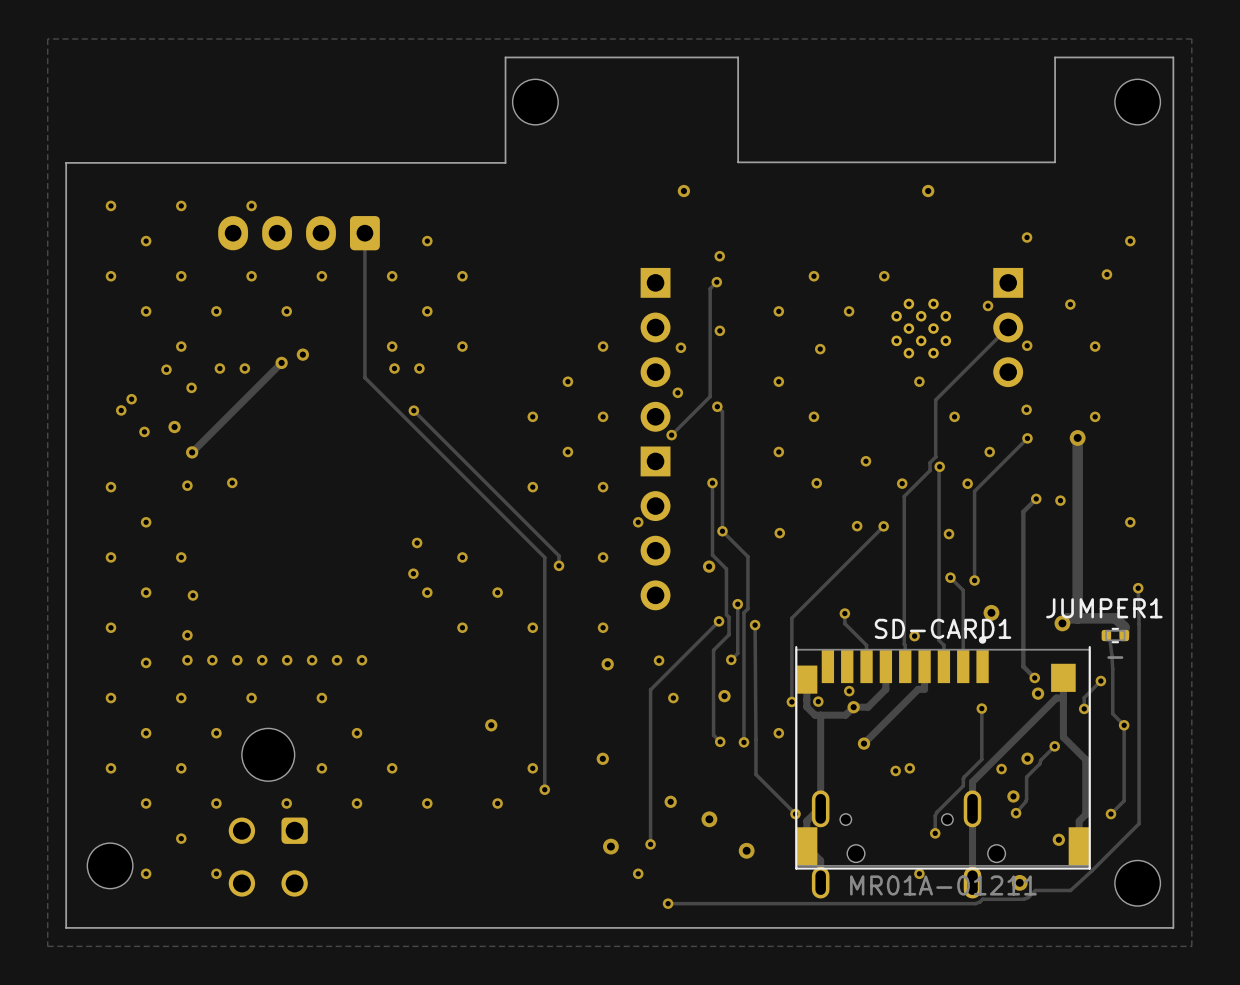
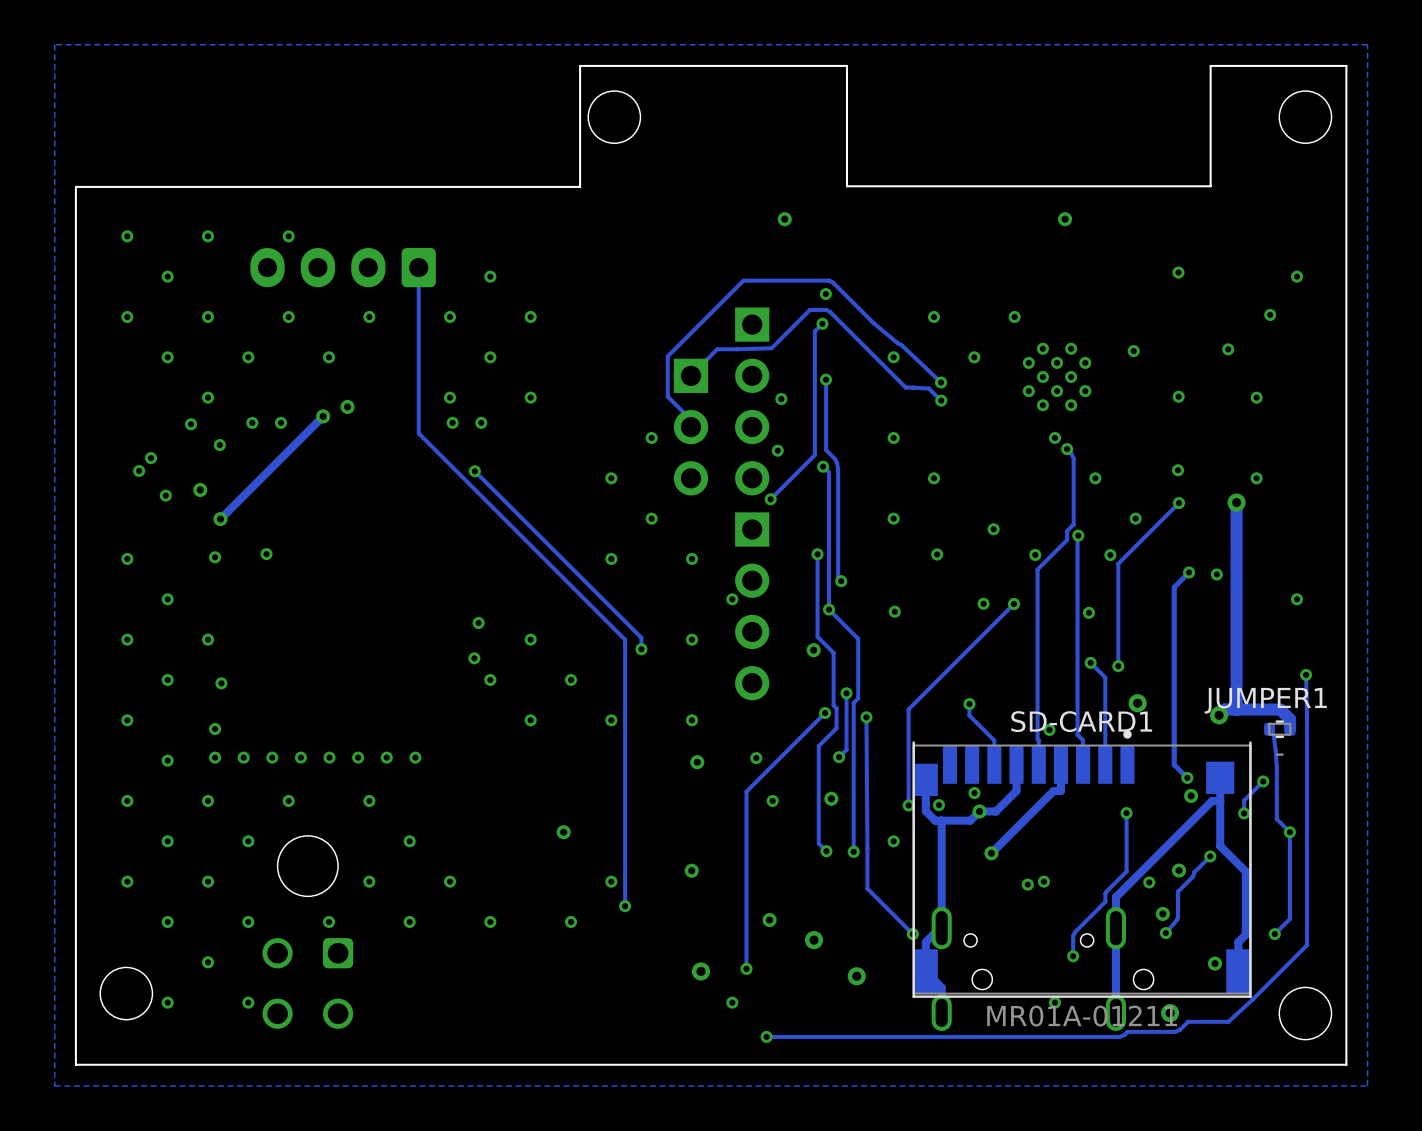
track: none -> (690, 375) (717, 349) (771, 348) (809, 309) (826, 309) (905, 387) (928, 388) (941, 400)
track: (1008, 327) (935, 400) -> (1067, 449) (1074, 459)
part position: (1008, 327) -> (690, 427)
track: none -> (826, 379) (826, 450) (835, 459) (838, 470) (838, 578) (841, 581)
track: none -> (941, 382) (901, 345) (873, 323) (833, 282) (829, 280) (743, 280) (667, 356) (667, 396) (682, 411)
via: none -> (941, 382)
via: (603, 346) -> none
via: none -> (1067, 449)
via: (603, 416) -> none
via: none -> (841, 581)

